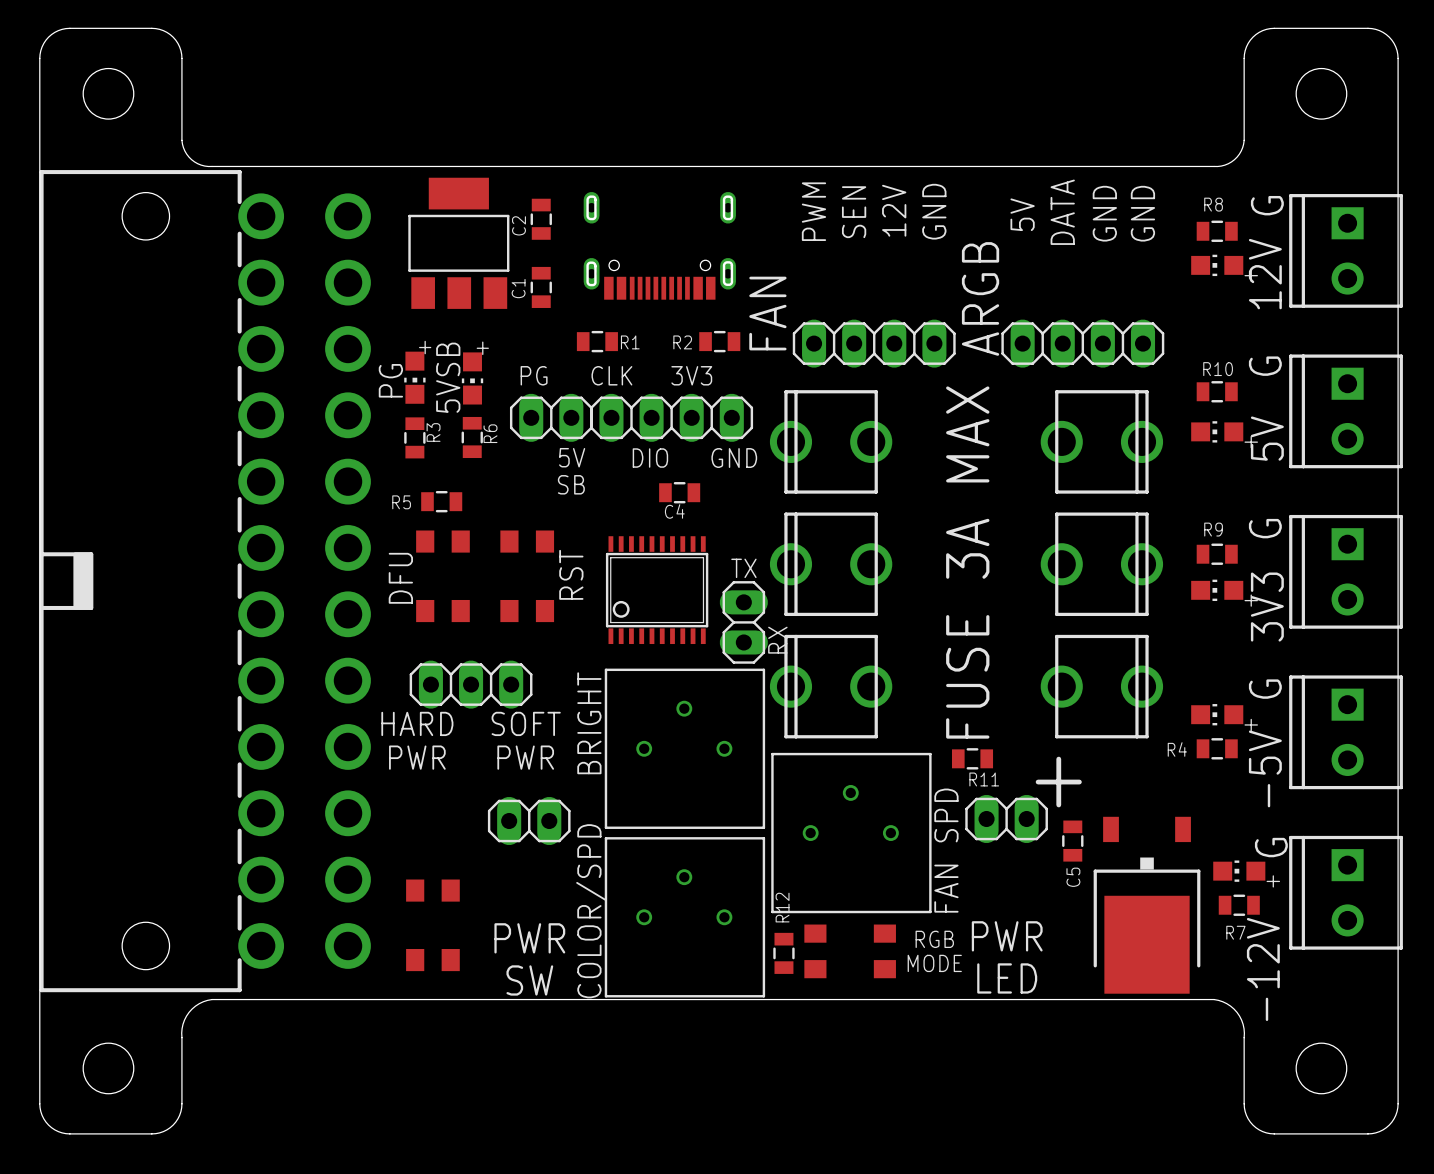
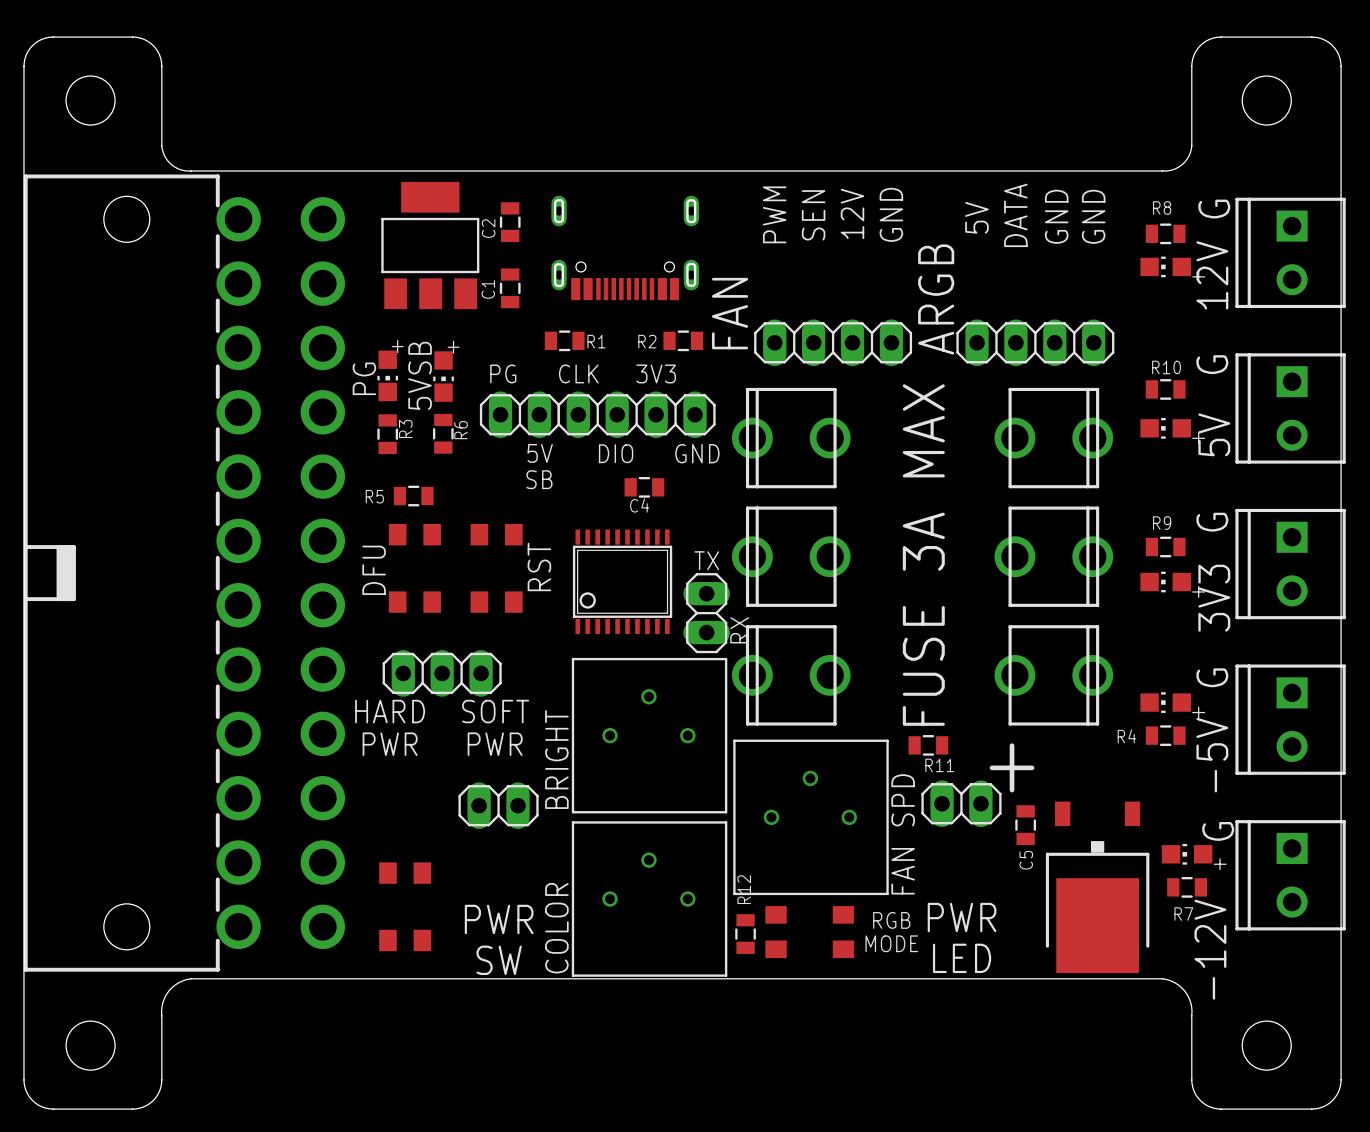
text position: BRIGHT (589, 723) -> BRIGHT (556, 759)
text: COLOR/SPD (591, 911) -> COLOR (556, 928)

